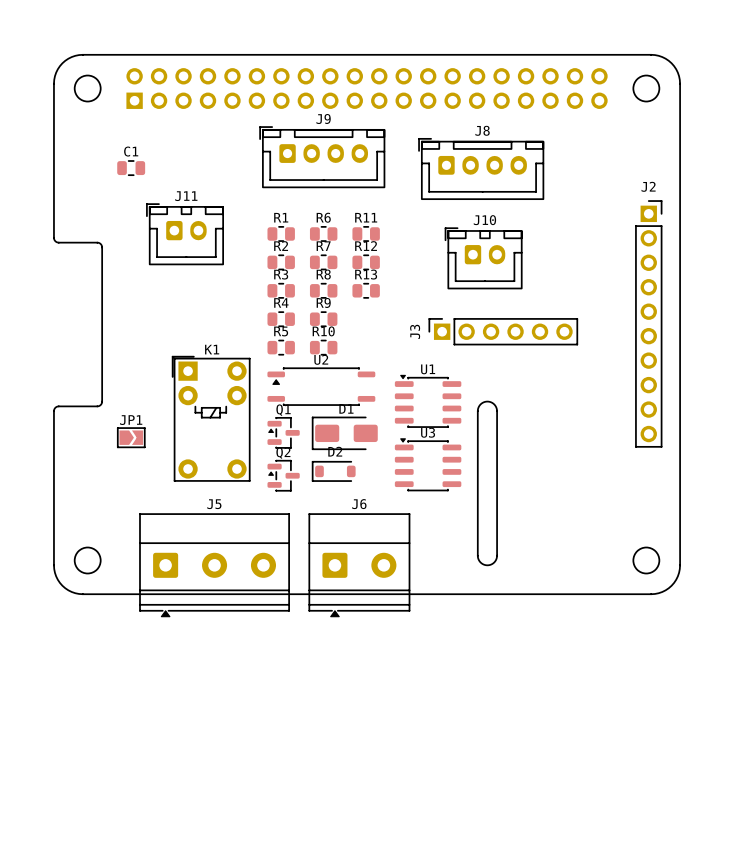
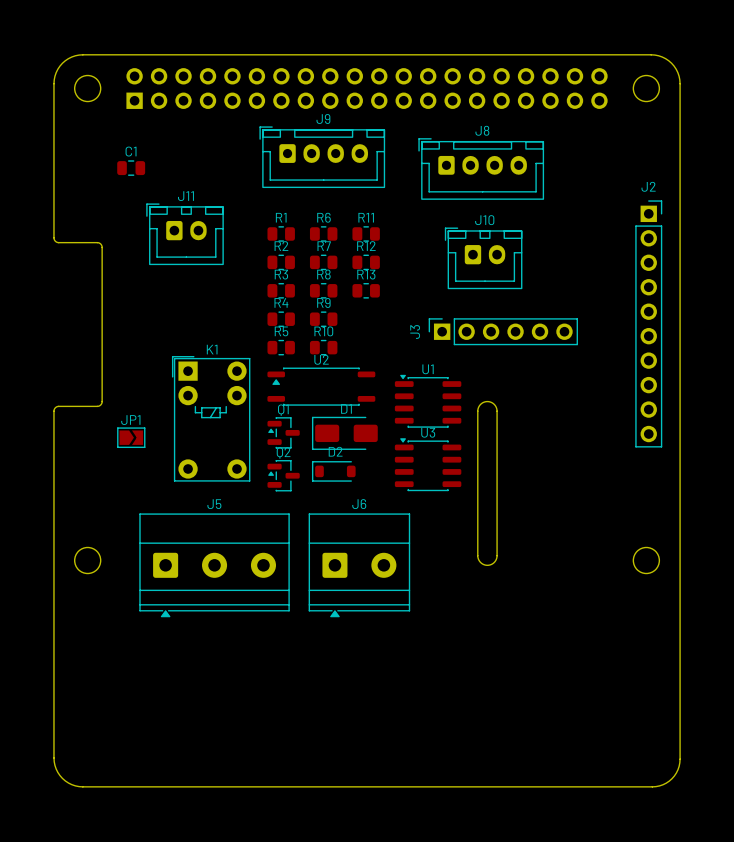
board edge: (53, 565) (56, 576) (62, 585) (71, 592) (82, 594) (651, 594) (662, 592) (671, 585) (677, 576) (680, 565) -> (53, 565) (54, 761) (62, 778) (71, 784) (82, 786) (652, 786) (662, 784) (674, 776) (679, 762) (680, 565)

